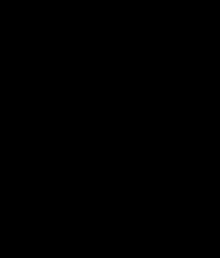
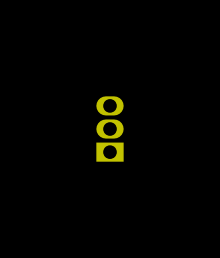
part: none -> (109, 129)

